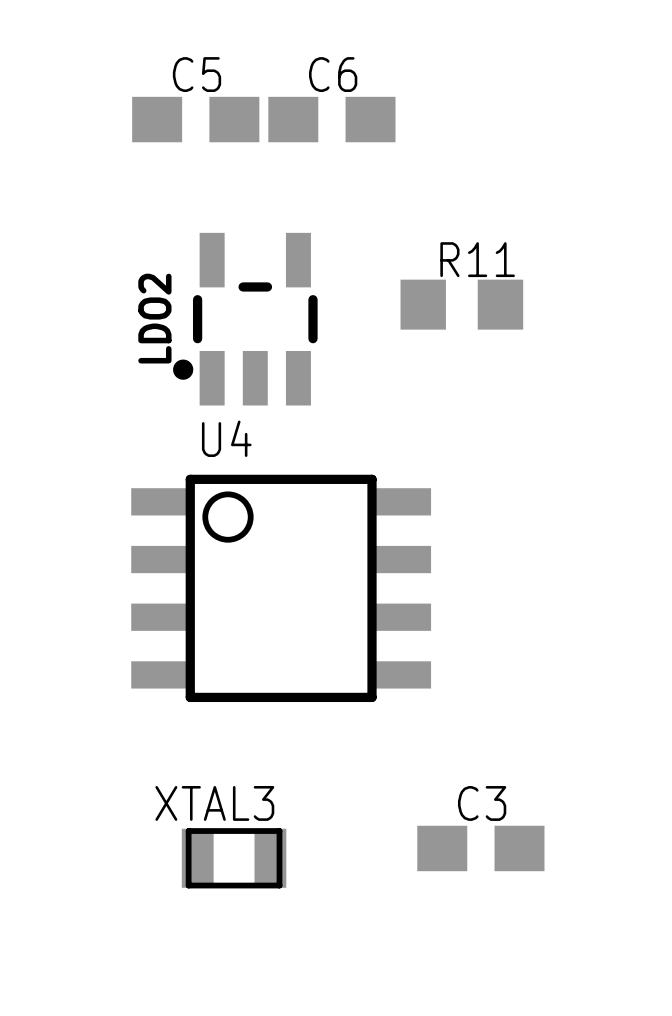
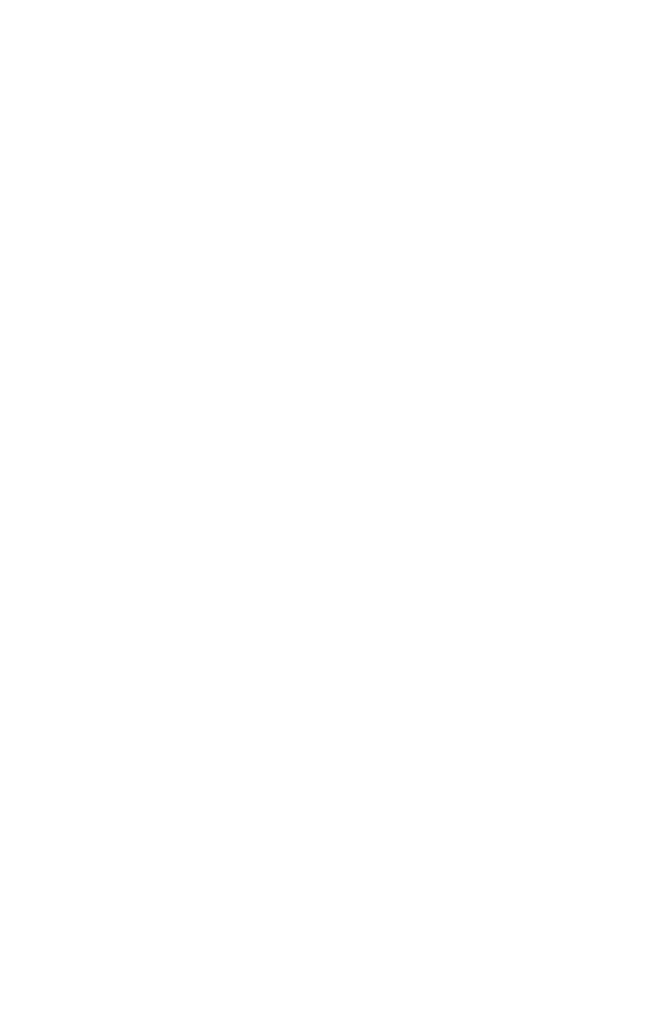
C5: (195, 119) -> none
C6: (331, 119) -> none
R11: (461, 304) -> none
LDO2: (245, 319) -> none
U4: (281, 588) -> none
C3: (480, 848) -> none
XTAL3: (234, 858) -> none

